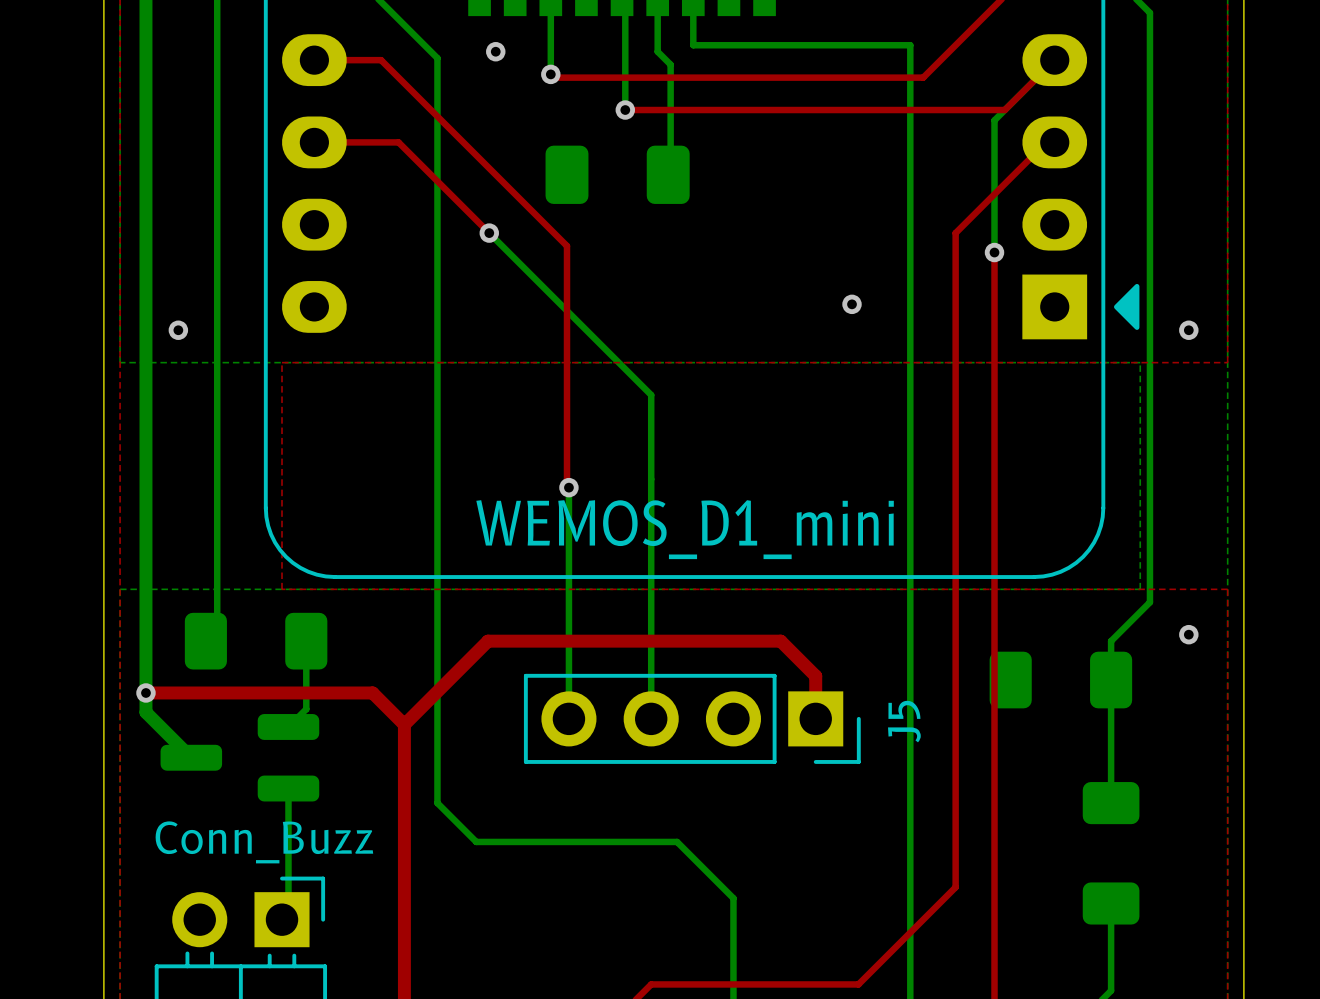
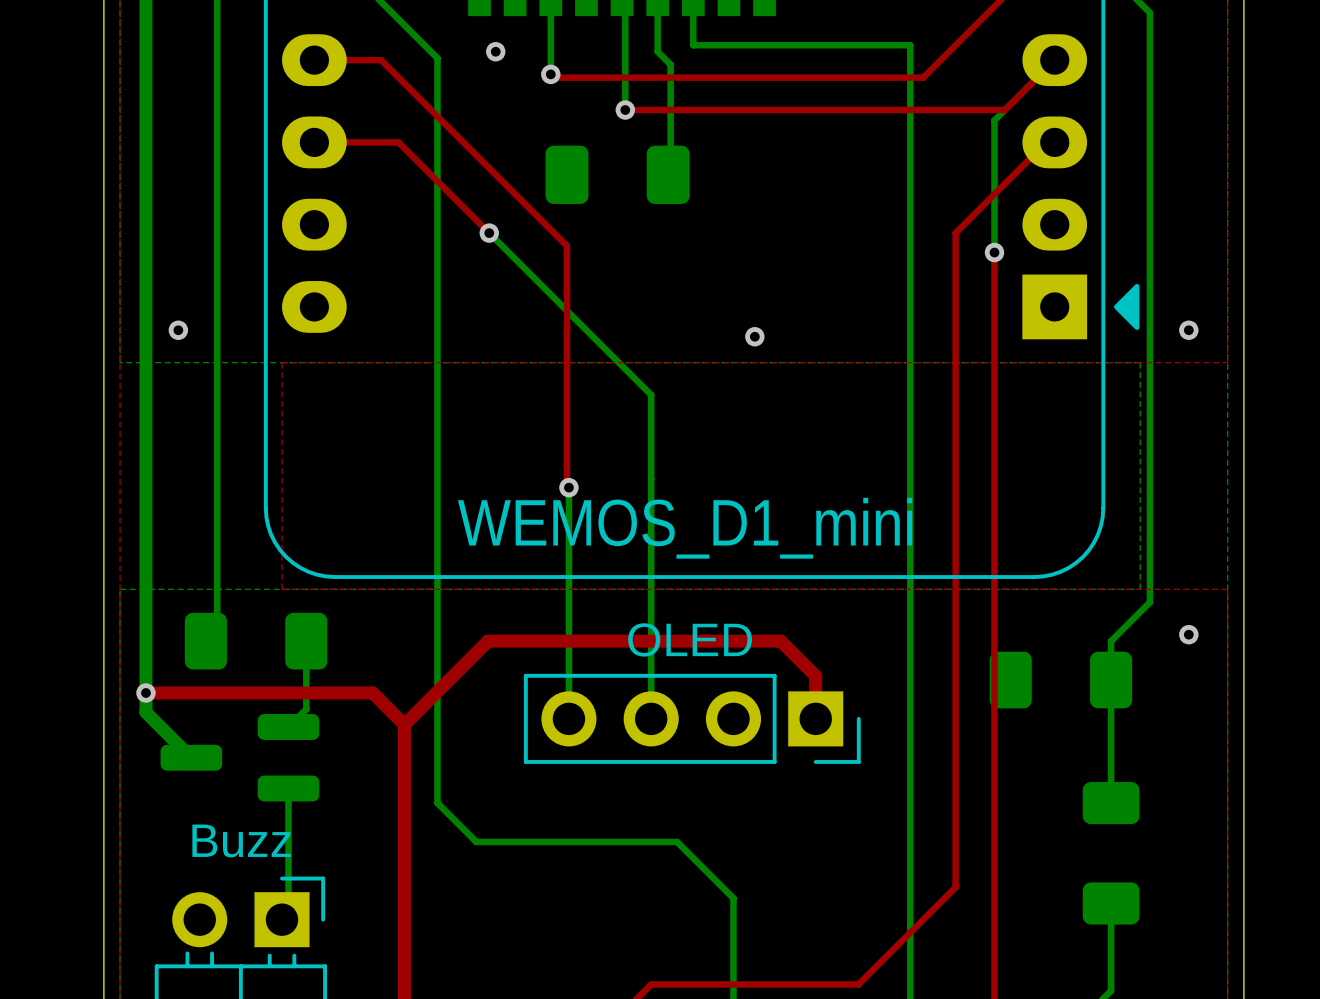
via position: (852, 304) -> (754, 336)
J5 value: none -> OLED (690, 639)
J5 name: J5 (904, 721) -> none
part value: Conn_Buzz (264, 842) -> Buzz (241, 840)

